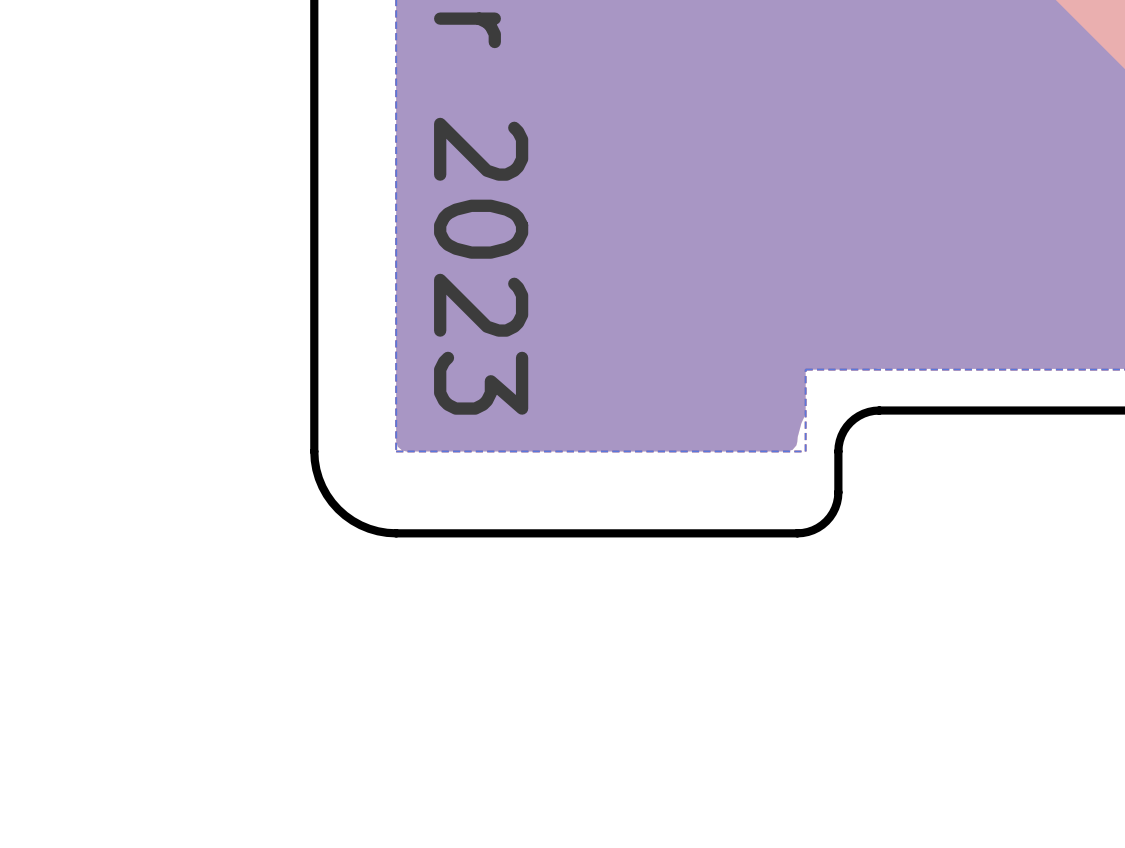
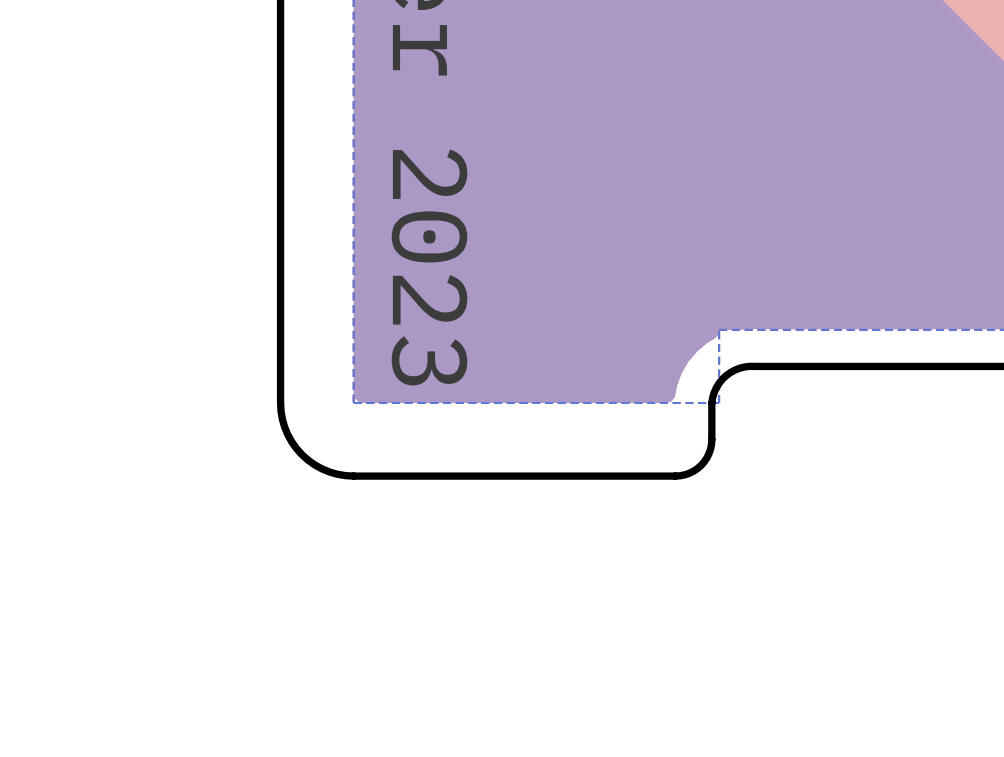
board edge: (879, 410) (868, 411) (854, 418) (841, 435) (838, 451) (838, 497) (835, 508) (826, 521) (817, 527) (802, 533) (756, 533) -> (784, 366) (745, 366) (735, 370) (722, 379) (712, 397) (711, 439) (709, 453) (697, 468) (689, 473) (675, 476)

